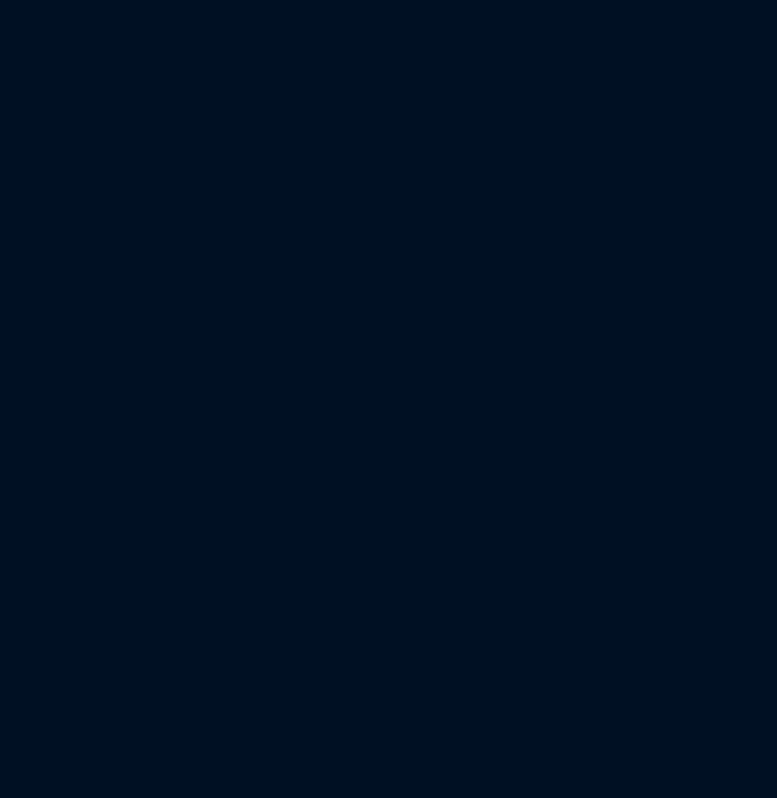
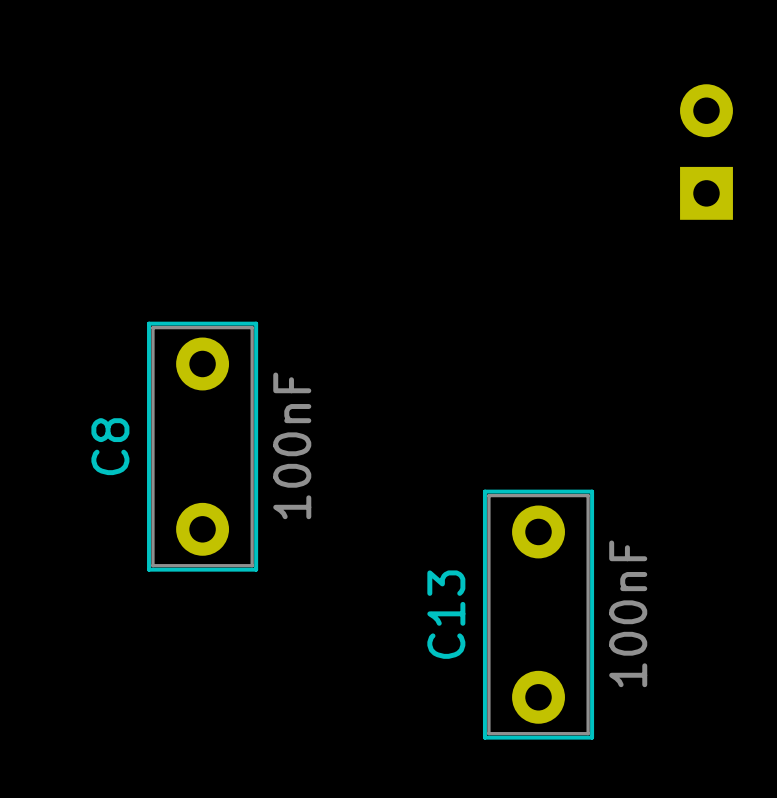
part: none -> (706, 152)
C8: none -> 100nF (202, 446)
C13: none -> 100nF (538, 614)

